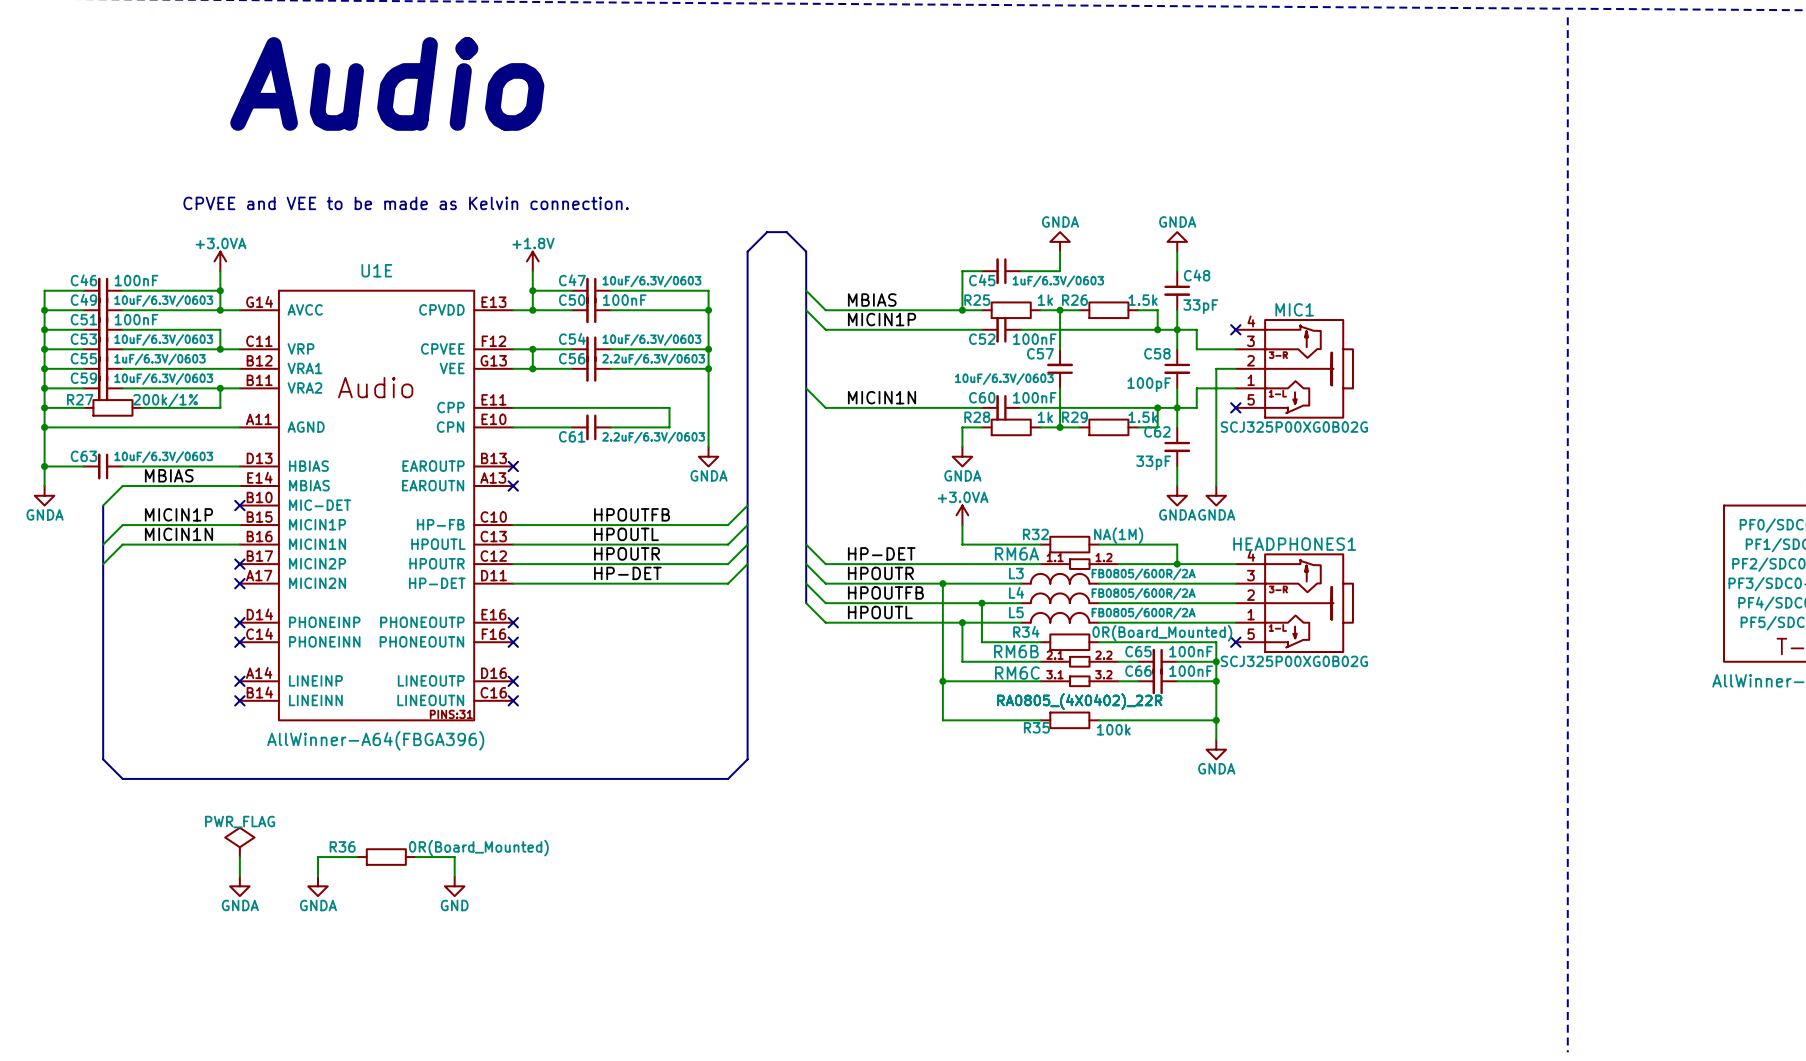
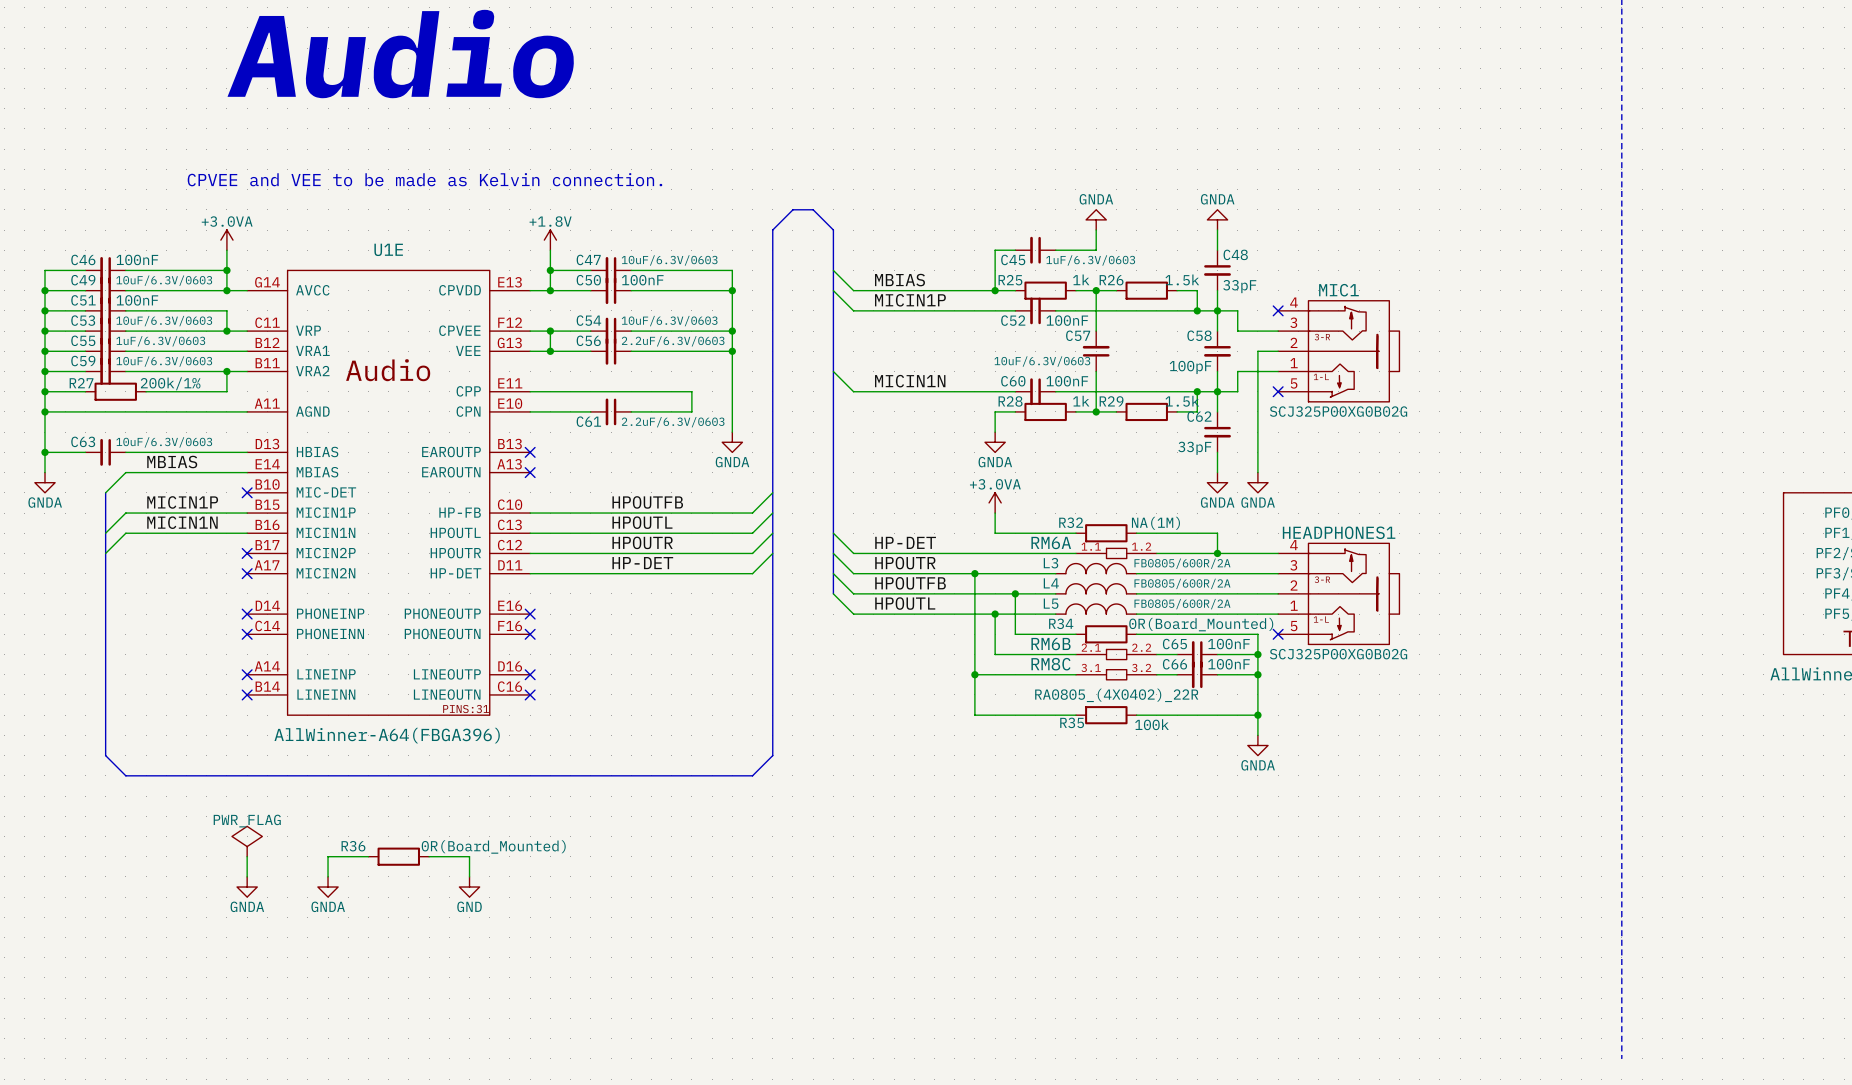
RM6C name: RM6C (1017, 673) -> RM8C (1050, 664)
RM6C value: RA0805_(4X0402)_22R (1079, 701) -> none

